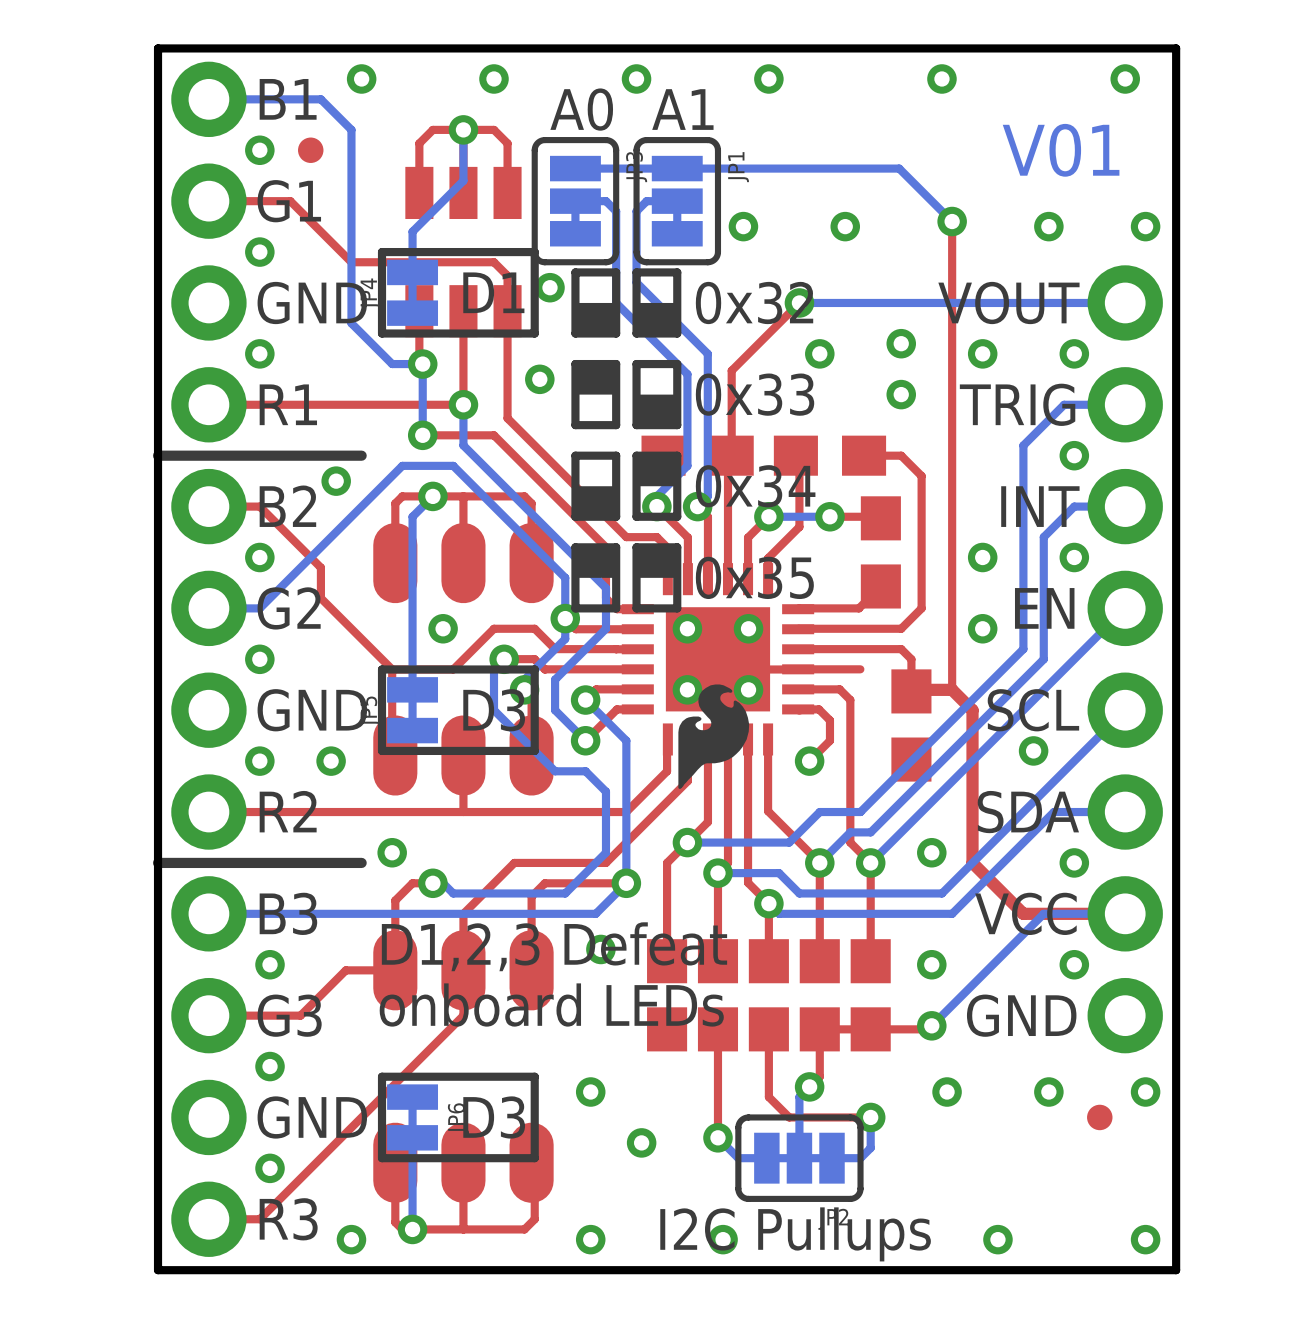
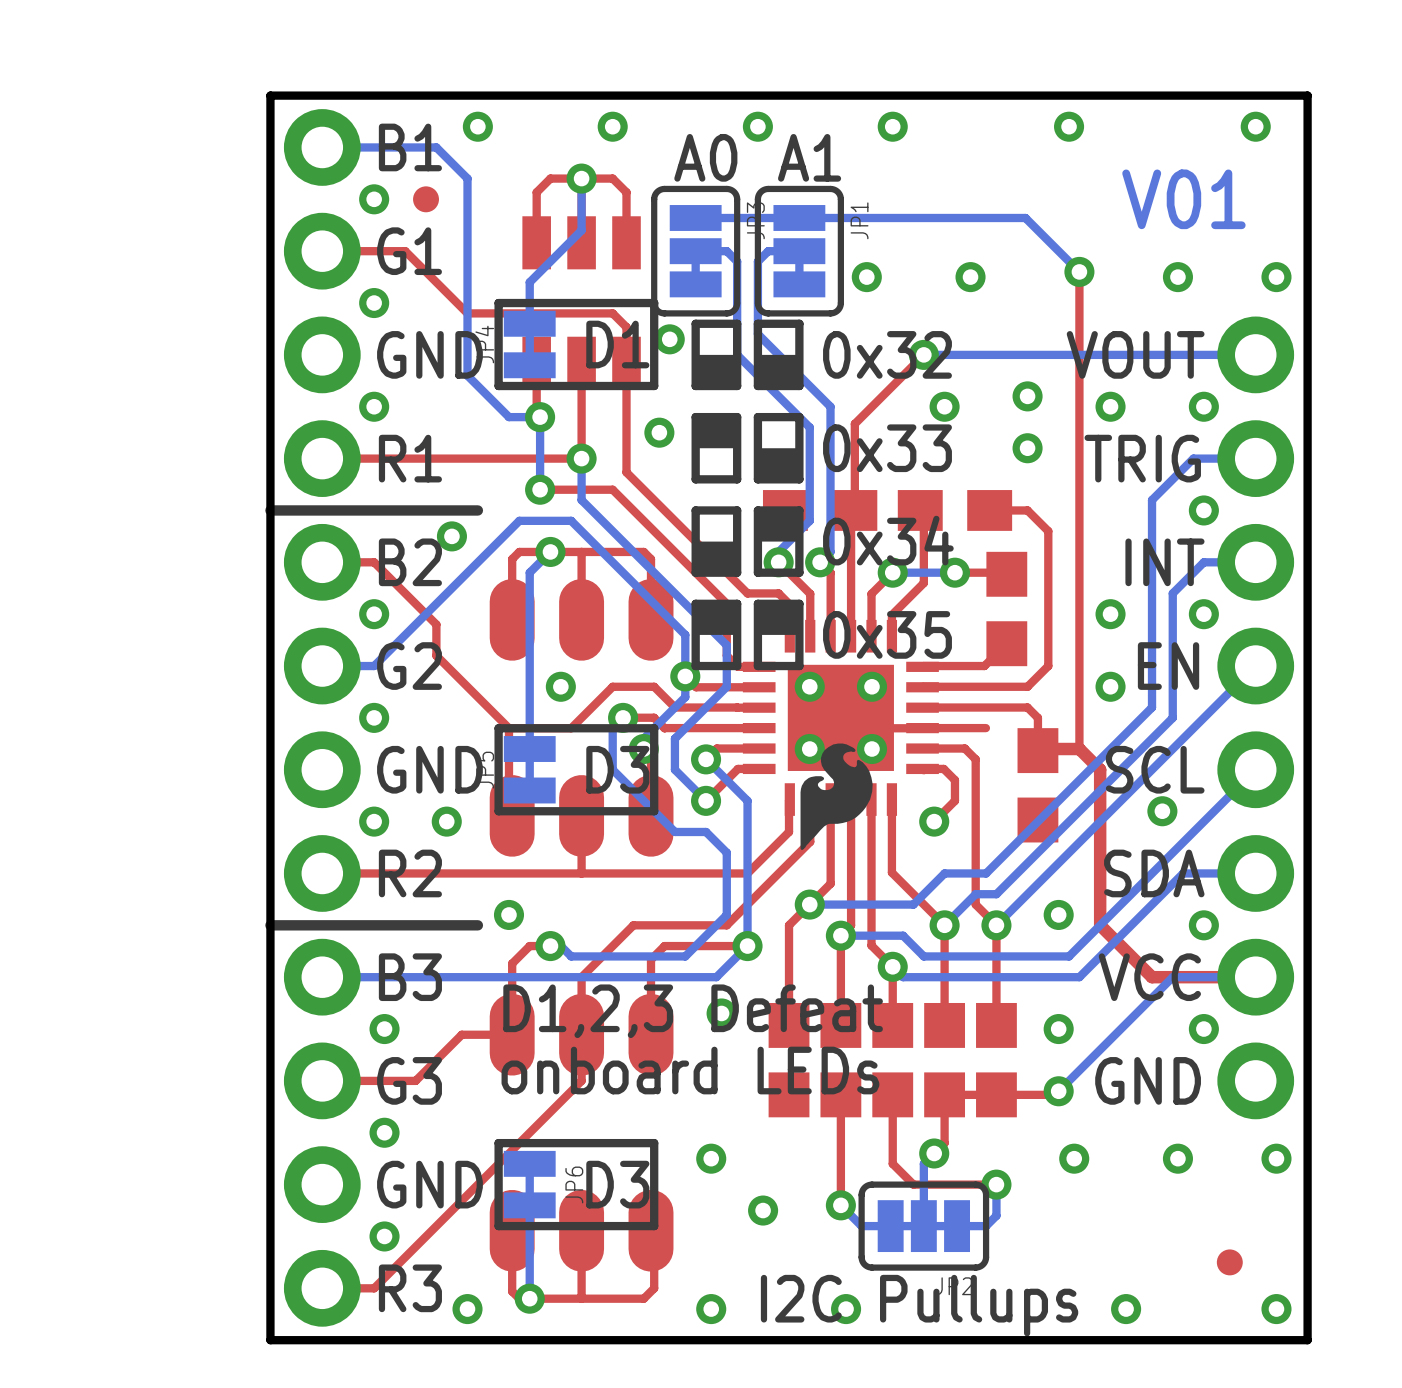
part position: (1099, 1117) -> (1229, 1262)

